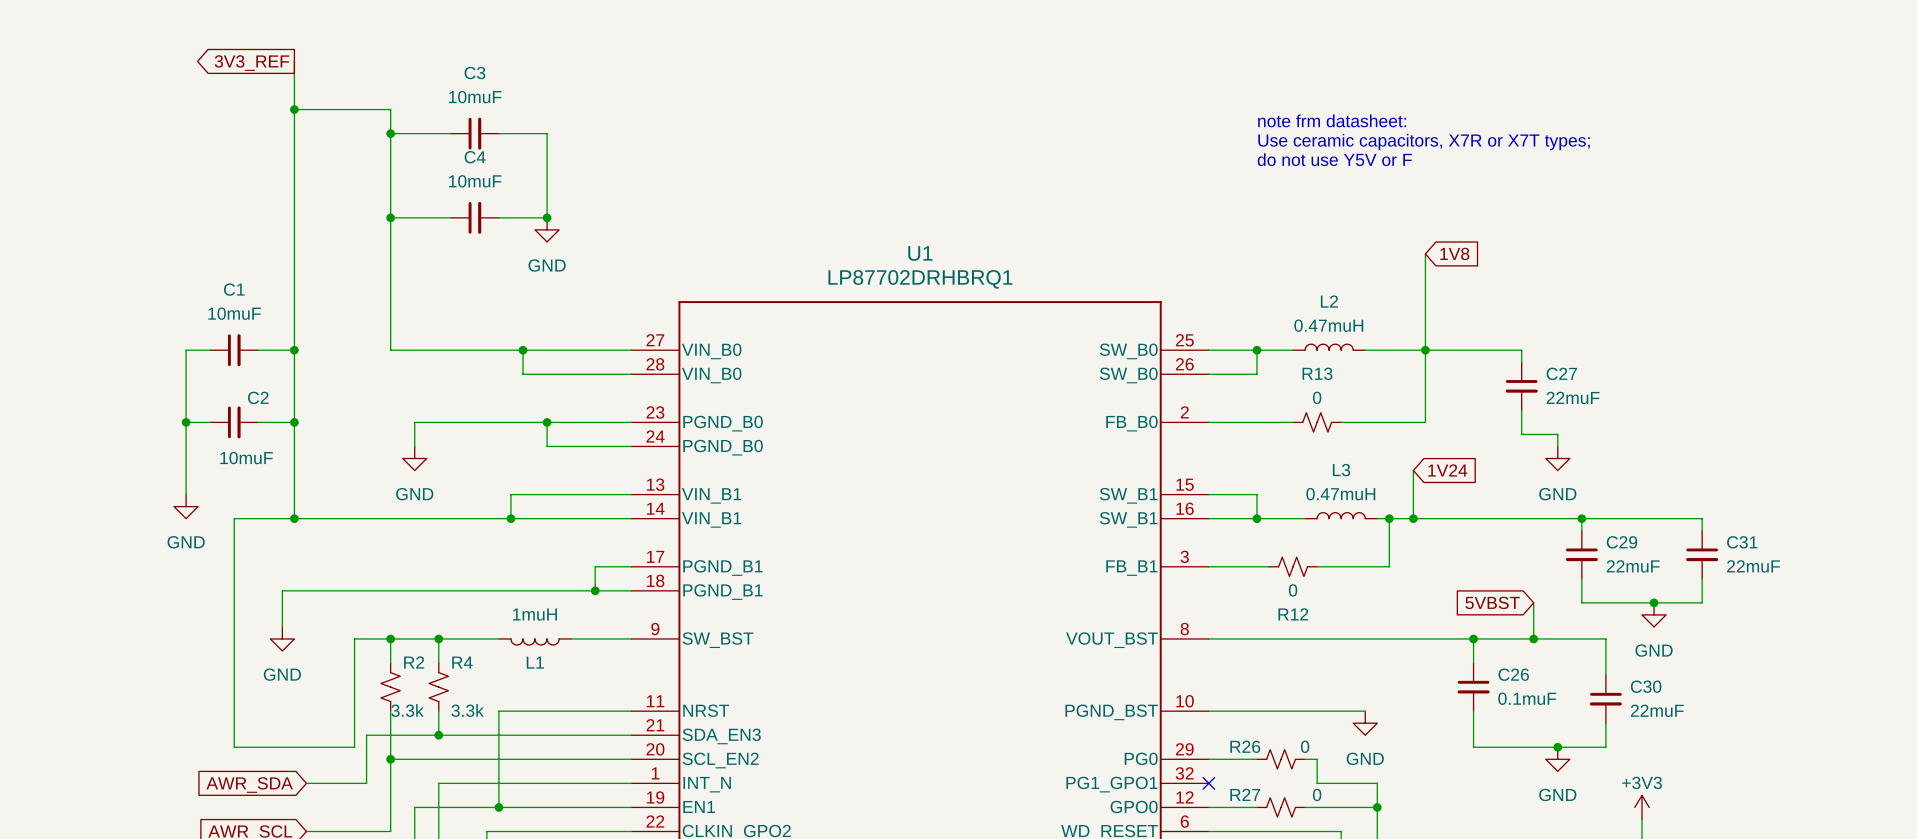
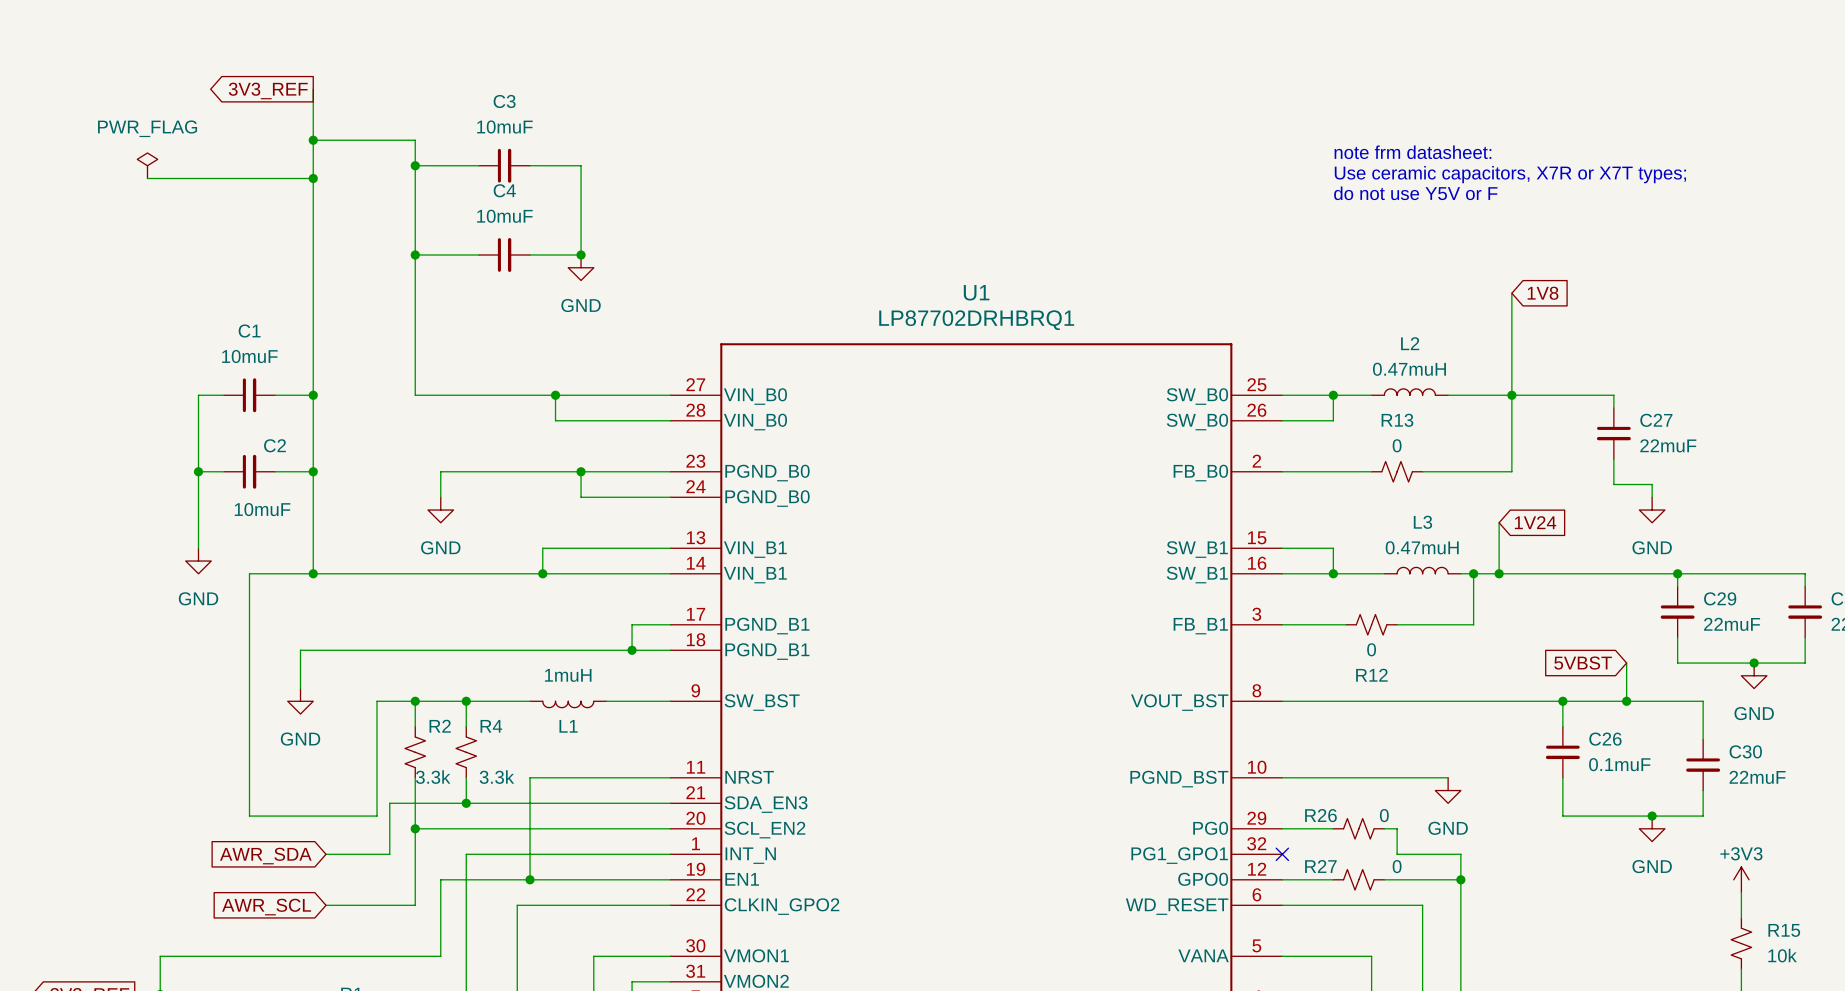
power symbol: none -> PWR_FLAG (147, 165)
wire: none -> (147, 178) (313, 178)
junction: none -> (313, 178)

